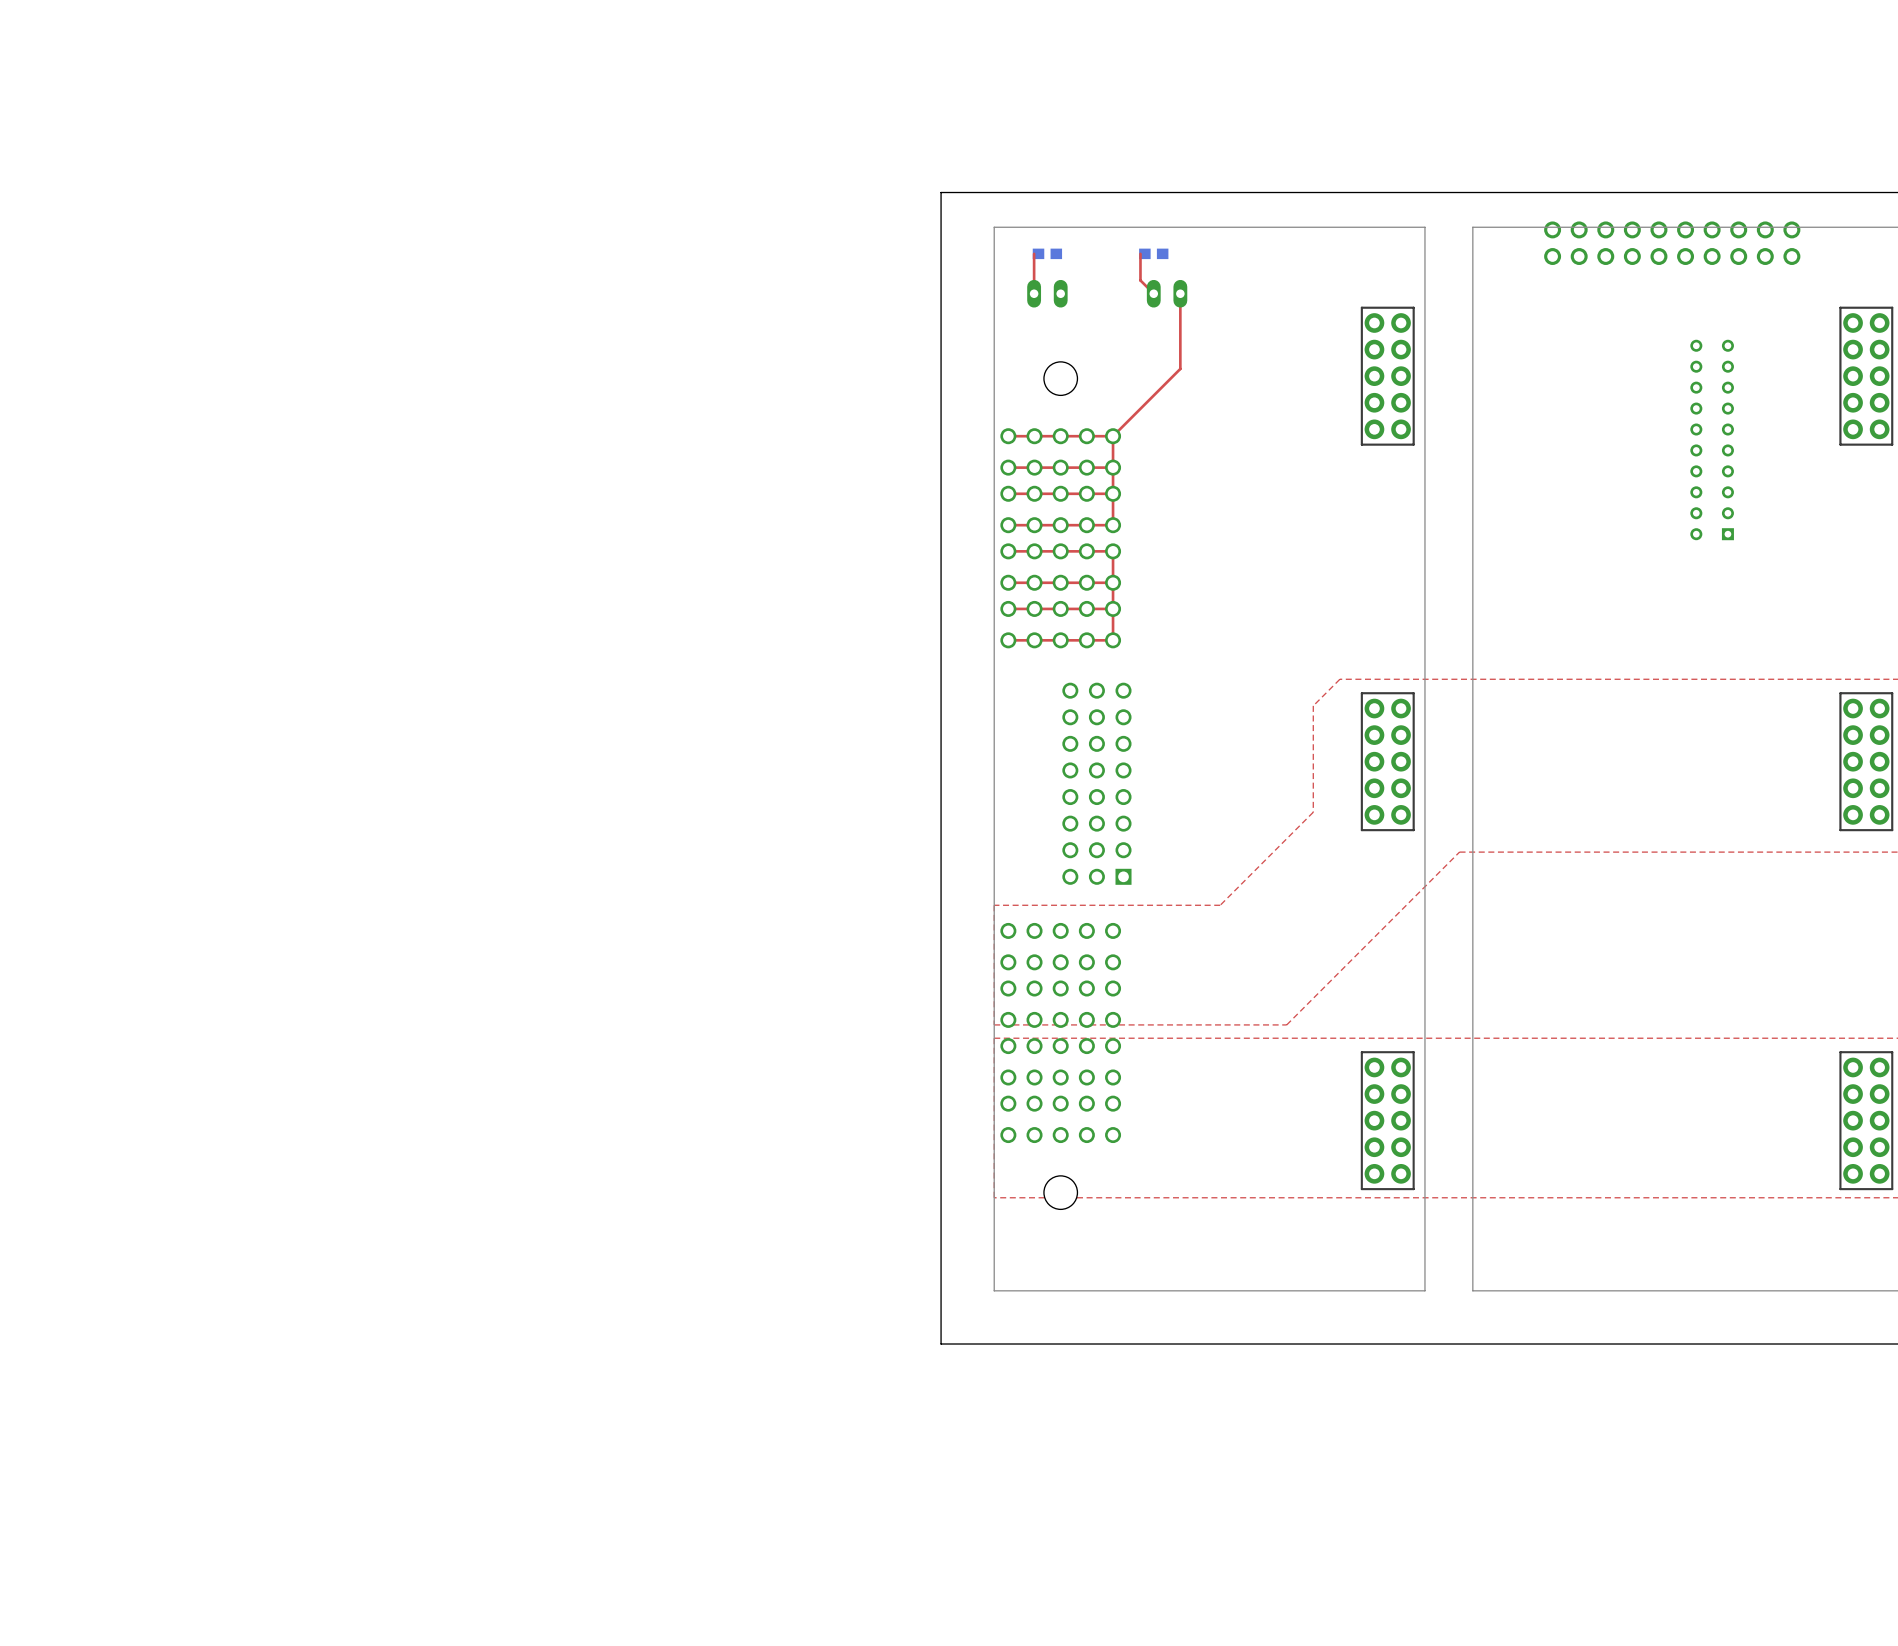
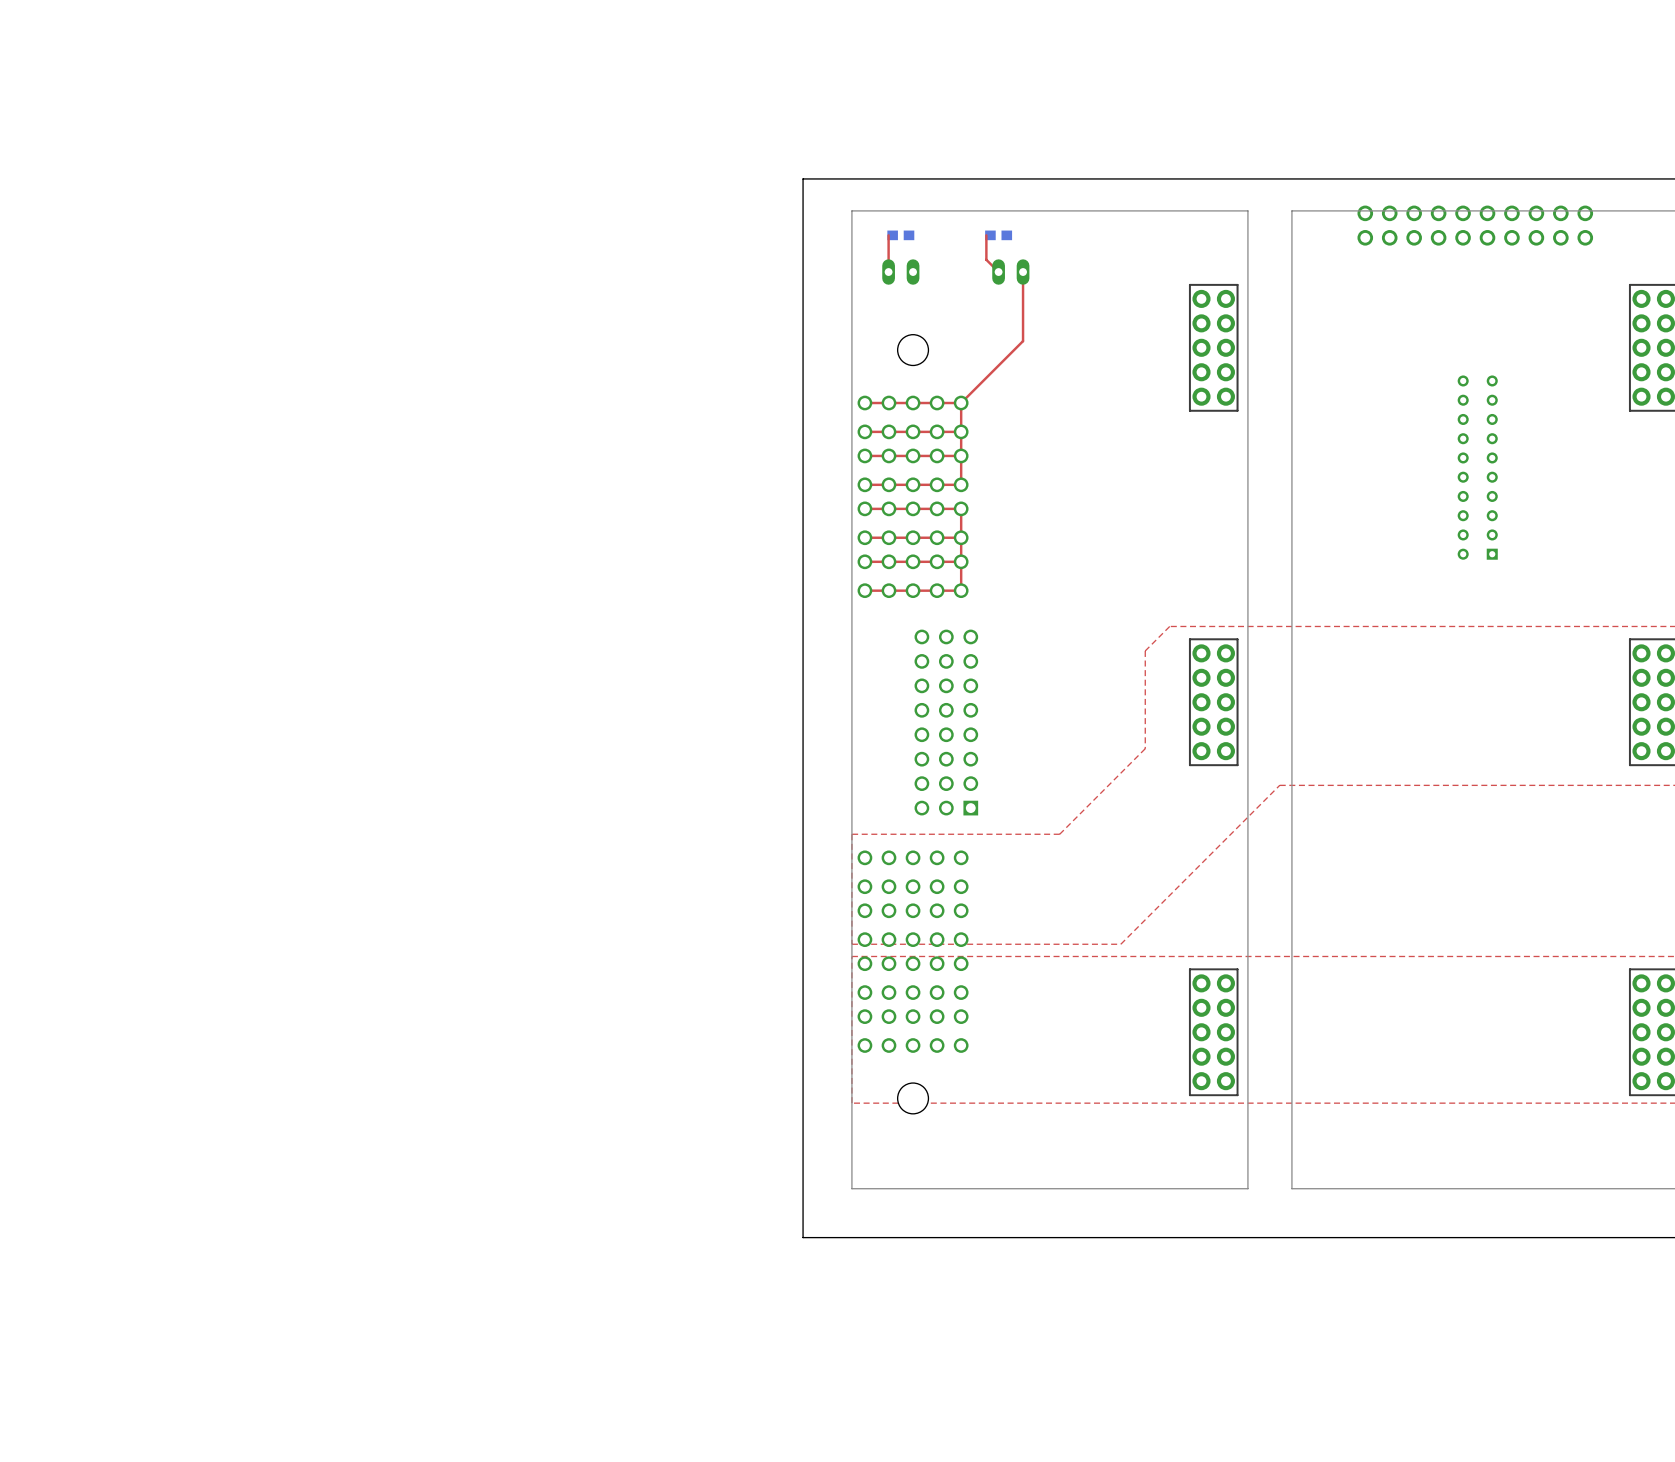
part position: (1712, 439) -> (1477, 467)

